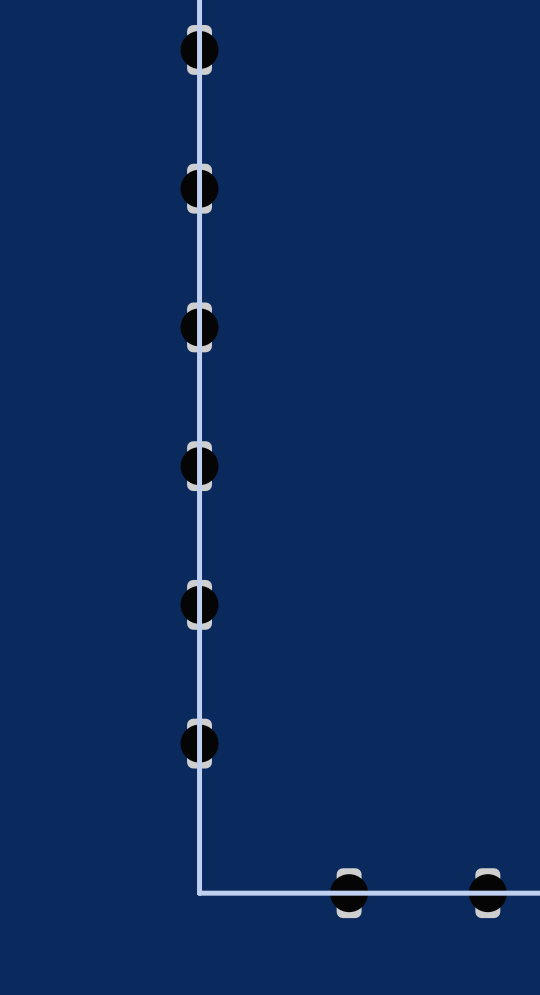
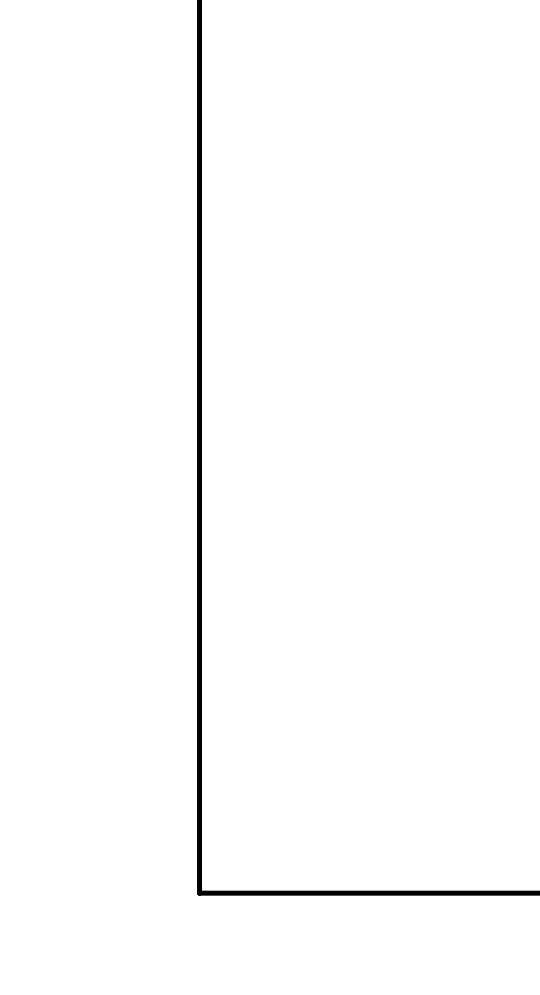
part: (199, 49) -> none
part: (199, 188) -> none
part: (199, 327) -> none
part: (199, 466) -> none
part: (199, 604) -> none
part: (199, 743) -> none
part: (349, 893) -> none
part: (487, 893) -> none

